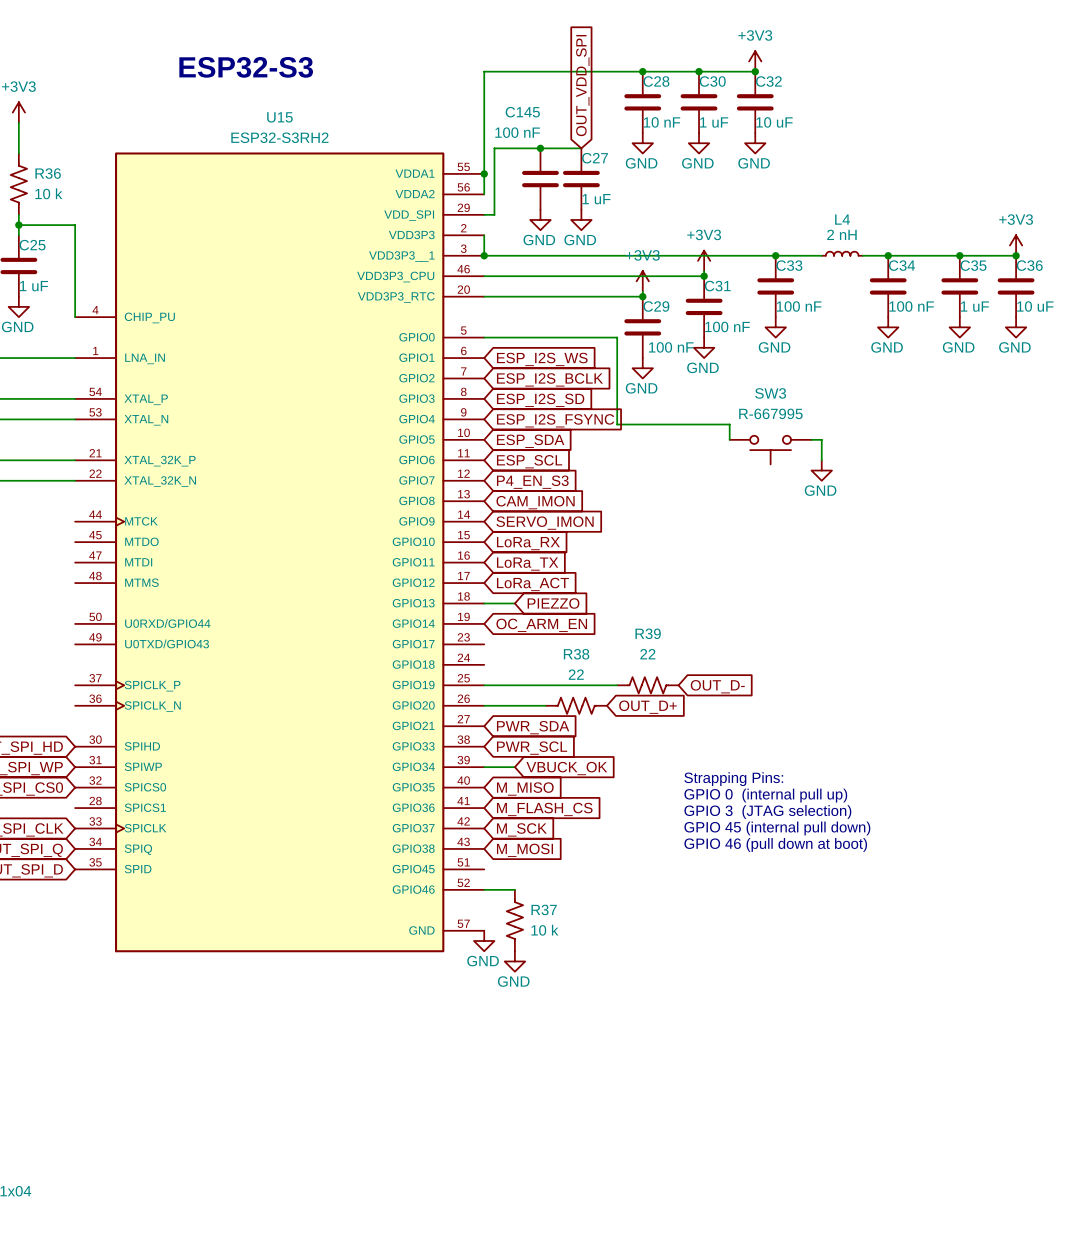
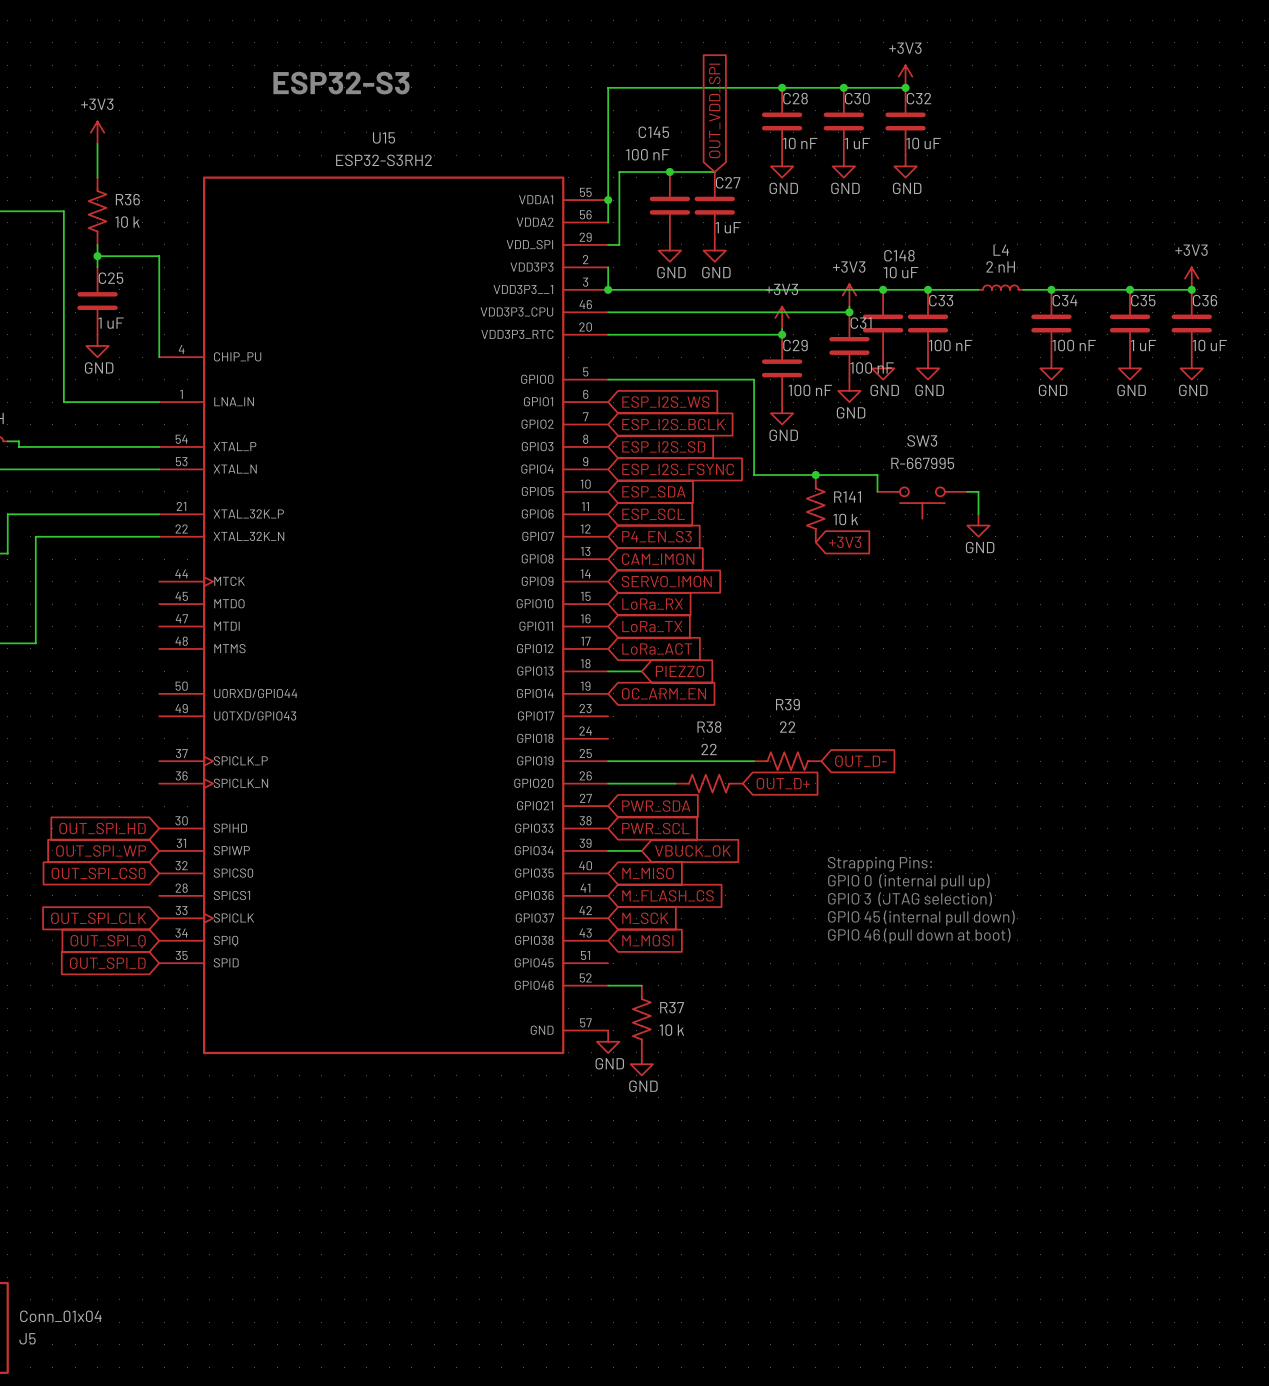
junction: none -> (883, 289)
C148: none -> 10 uF (883, 323)
power symbol: none -> GND (883, 368)
junction: none -> (815, 475)
R141: none -> 10 k (815, 508)
global label: none -> +3V3 (845, 542)

